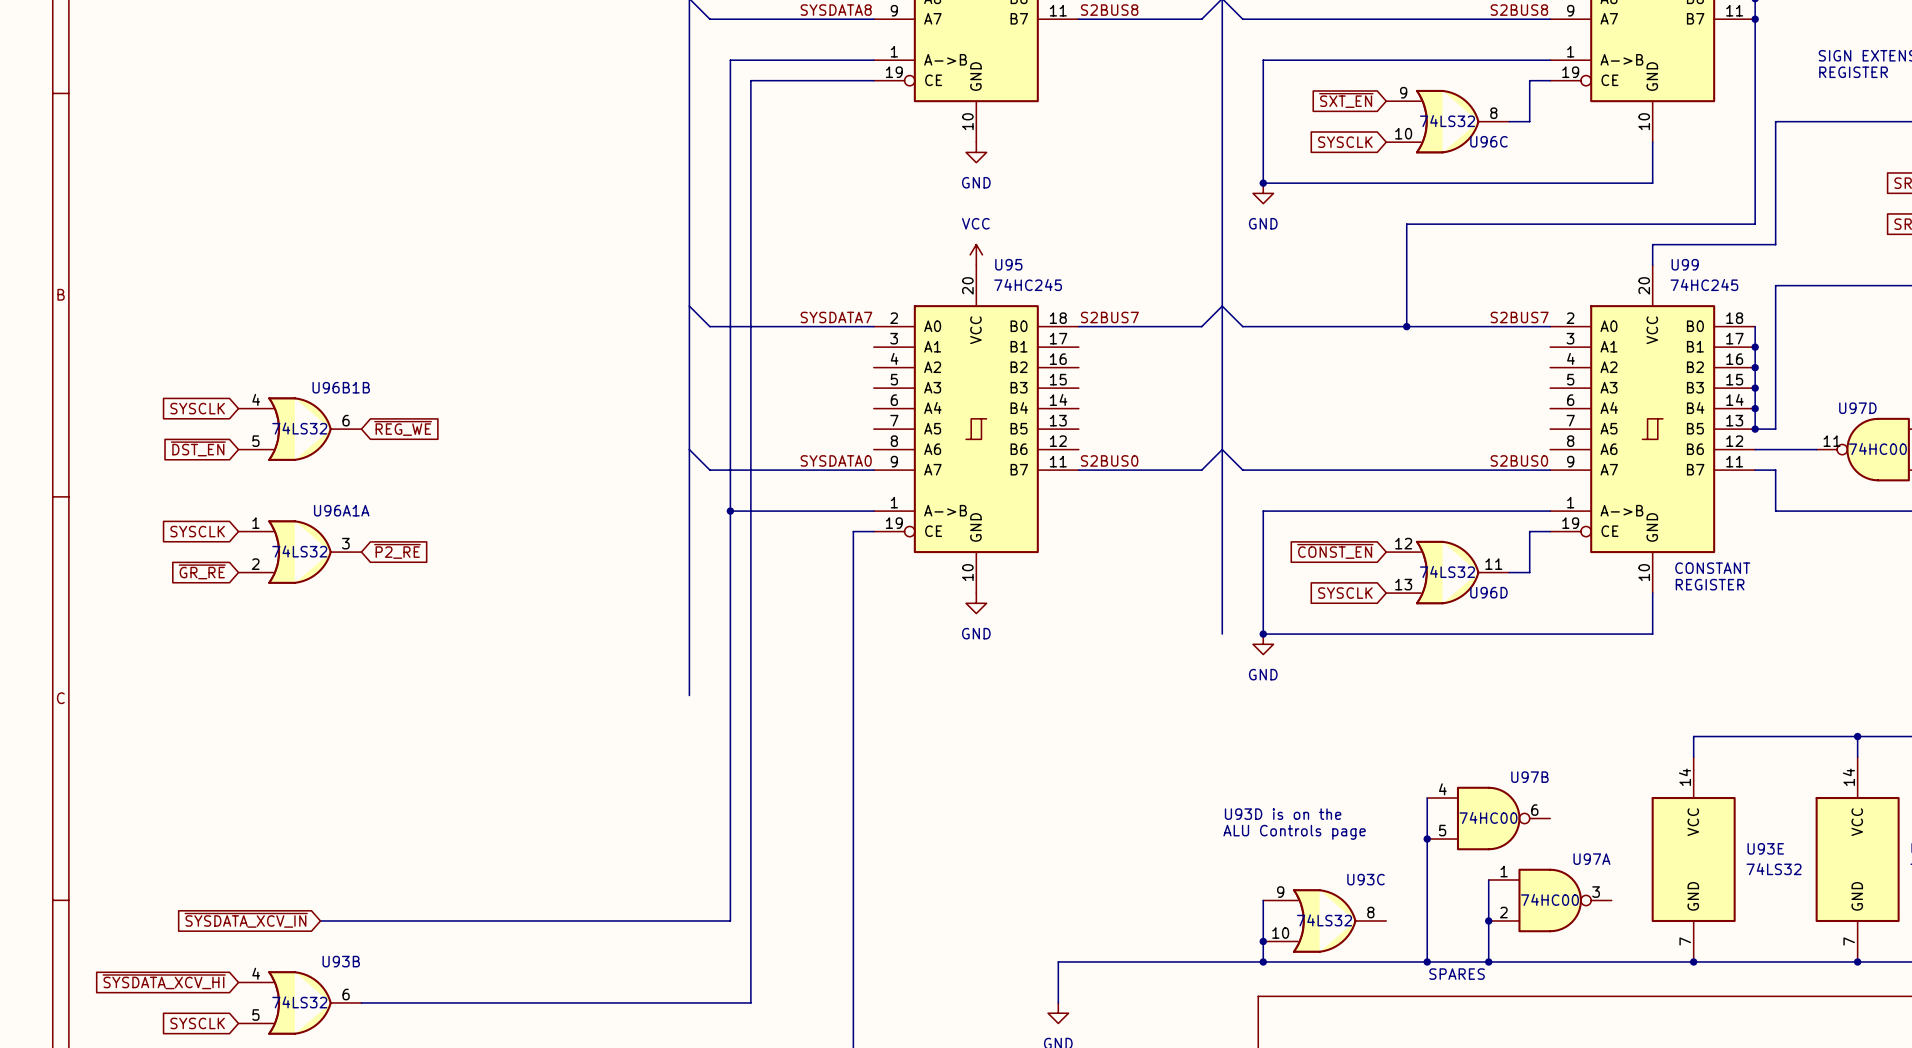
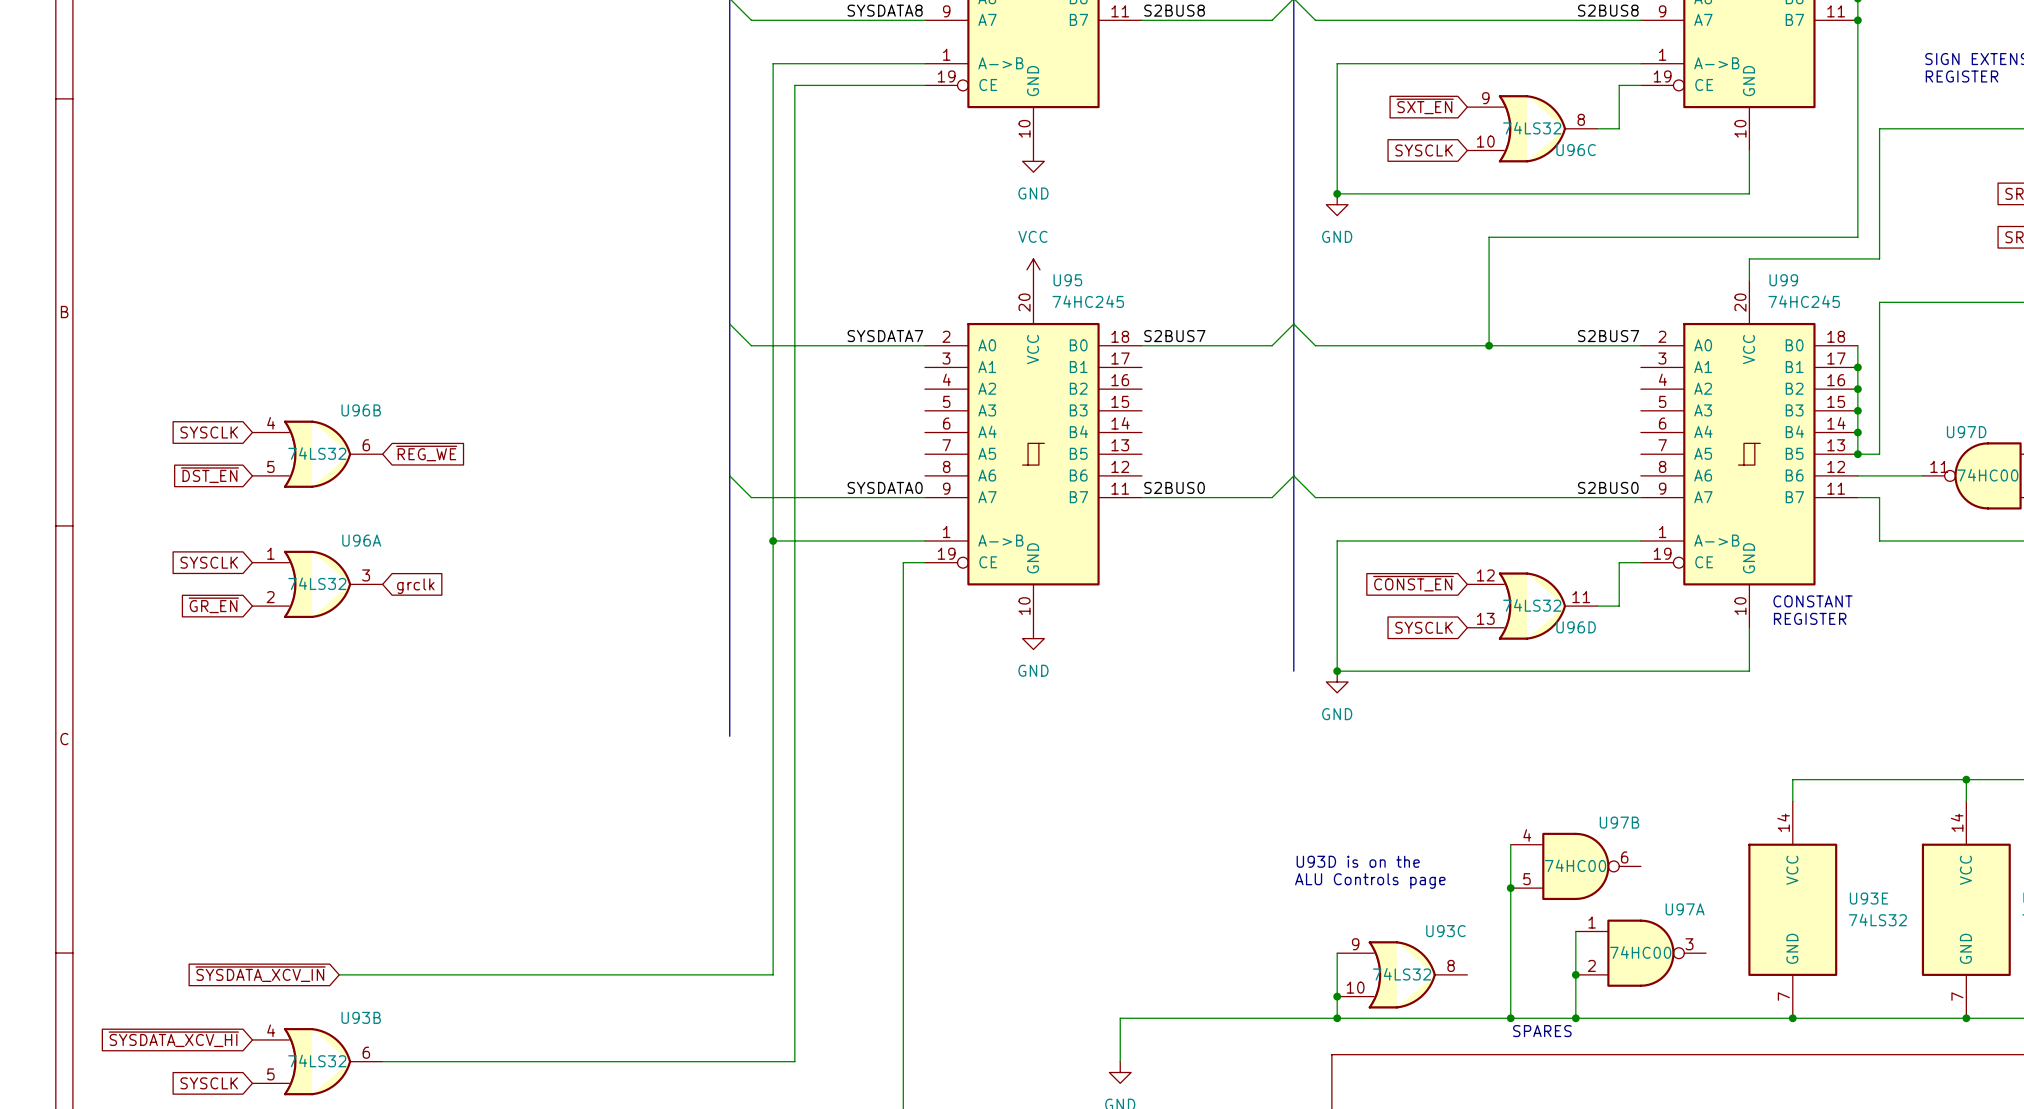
U96B1B name: U96B1B (341, 387) -> U96B (361, 410)
U96A1A name: U96A1A (341, 510) -> U96A (361, 540)
global label: ~{P2_RE} (397, 551) -> grclk (415, 586)
global label: ~{GR_RE} (202, 571) -> ~{GR_EN} (213, 605)

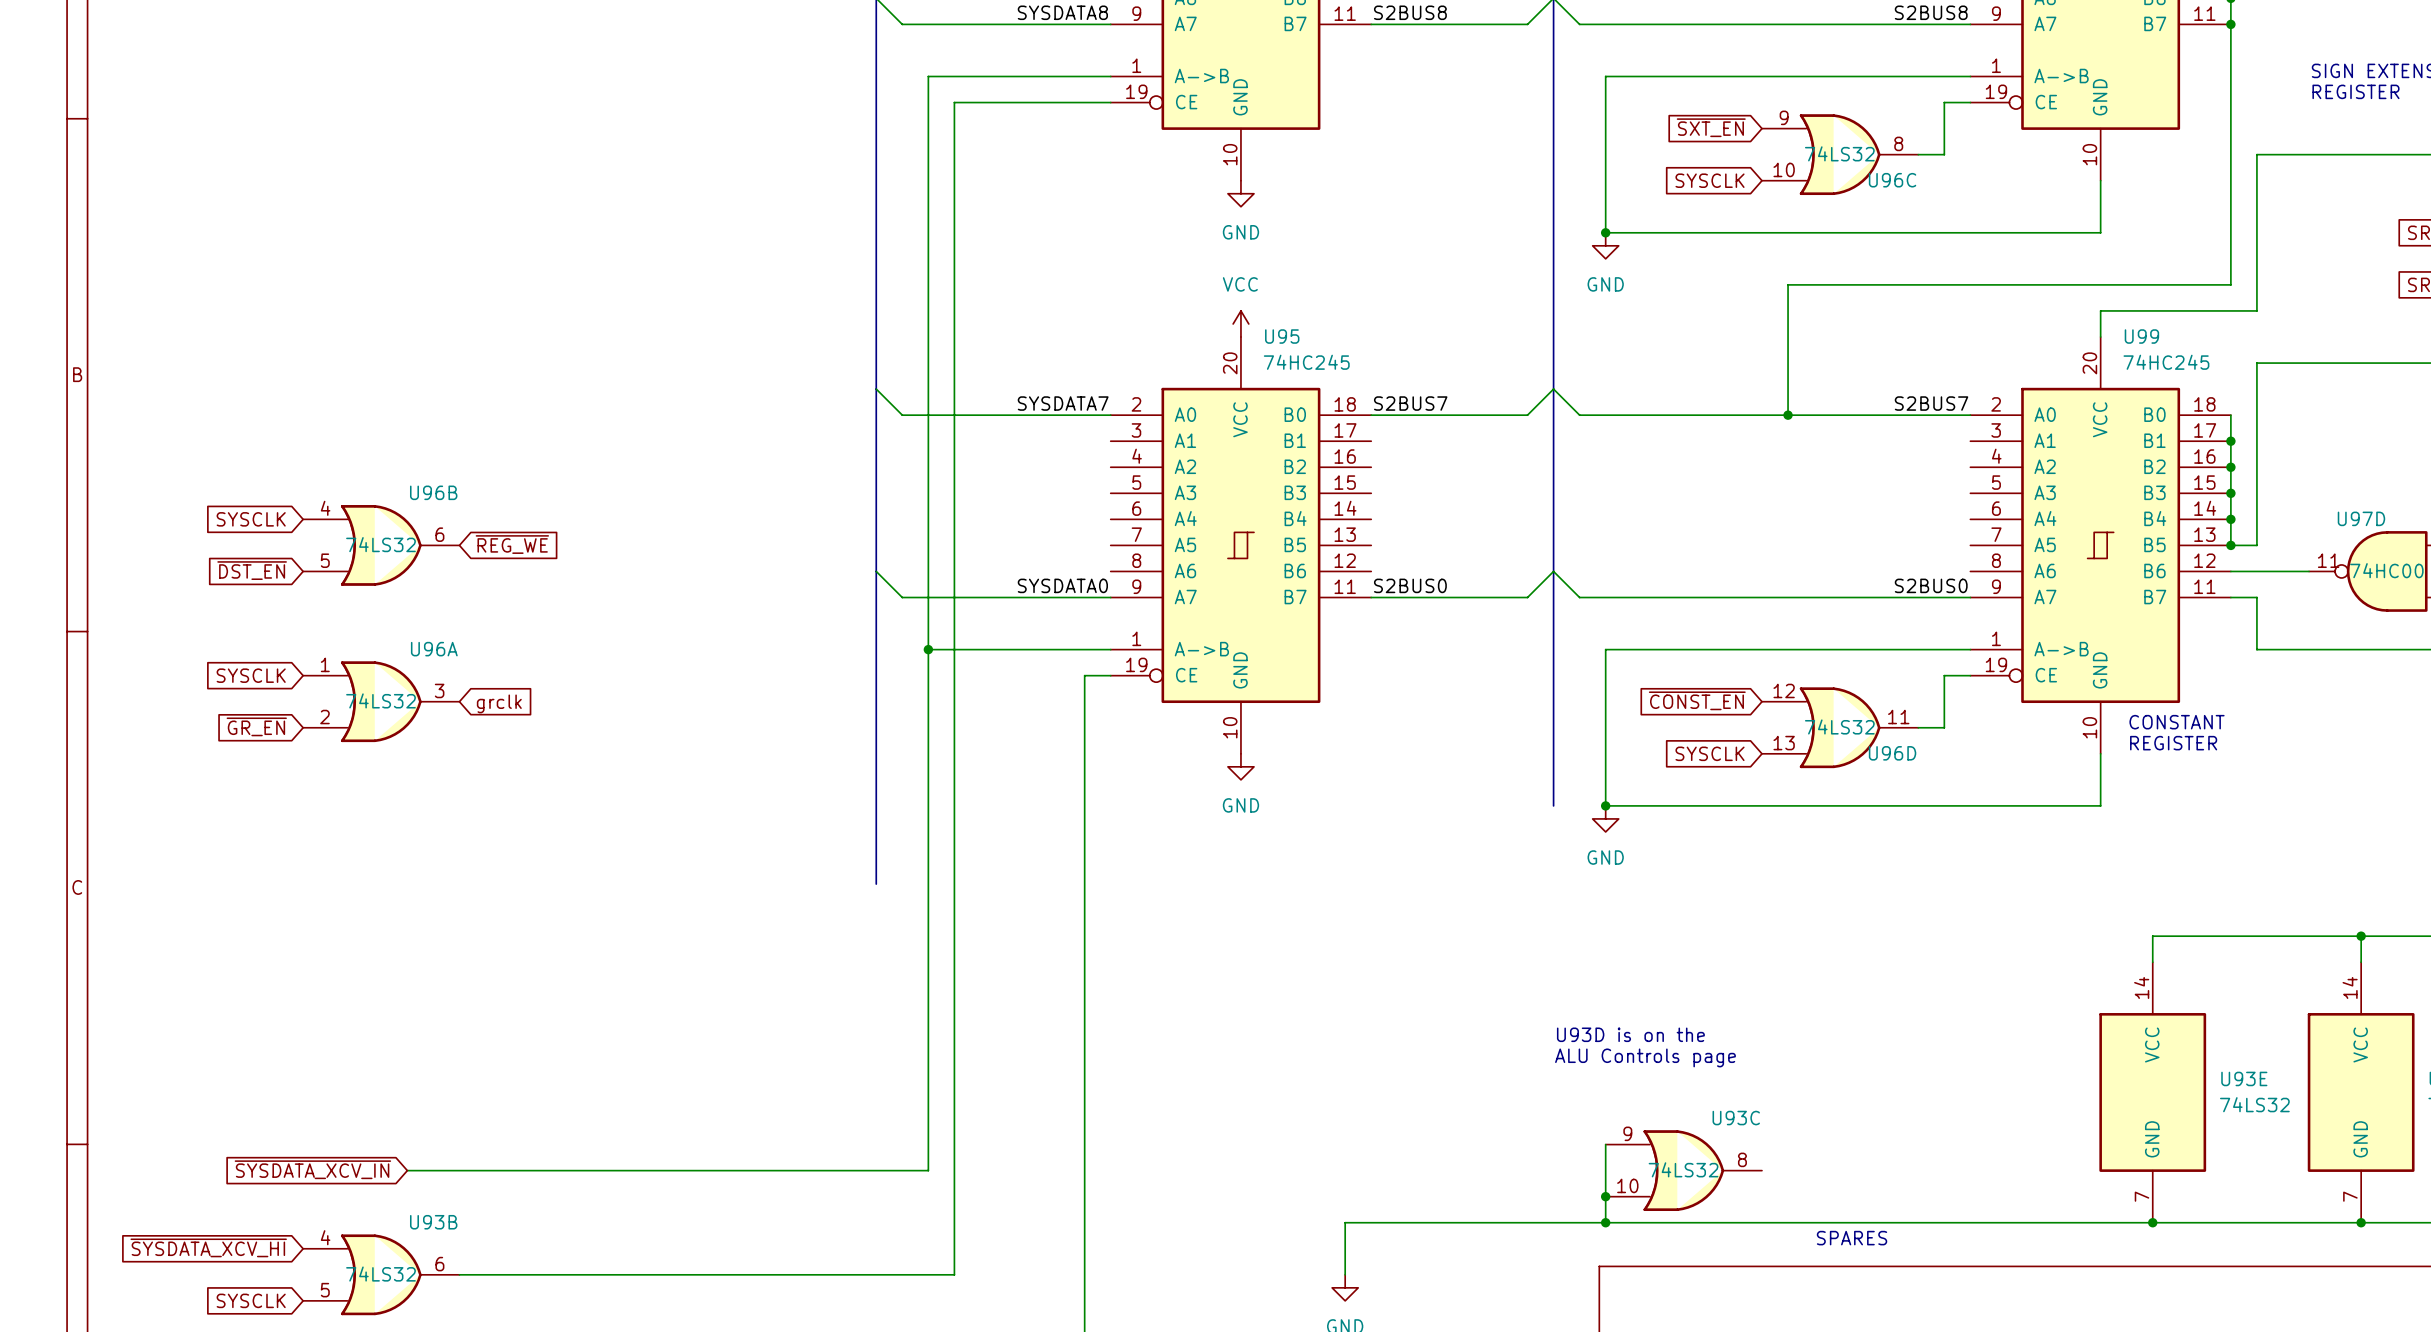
wire: (1510, 844) (1510, 1018) -> none
U97B: 74HC00 (1575, 866) -> none
junction: (1510, 888) -> none
wire: (1575, 931) (1575, 1018) -> none
U97A: 74HC00 (1640, 953) -> none
junction: (1575, 974) -> none
junction: (1510, 1018) -> none
junction: (1575, 1018) -> none

